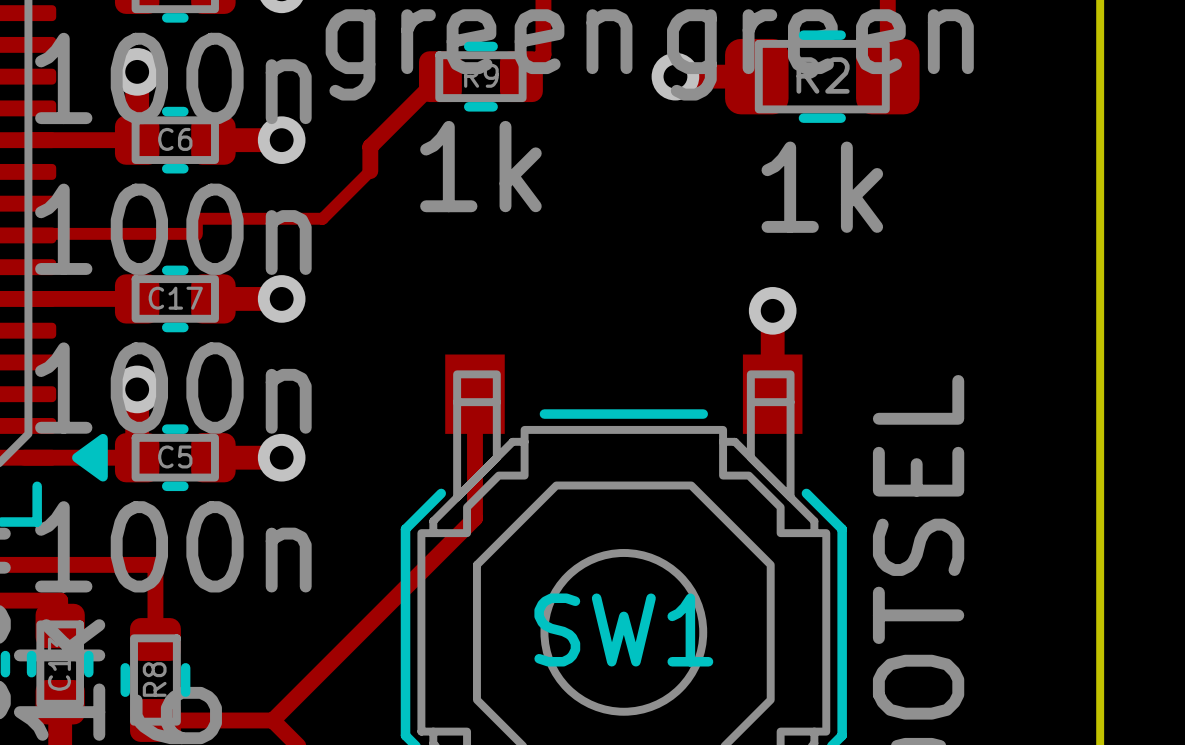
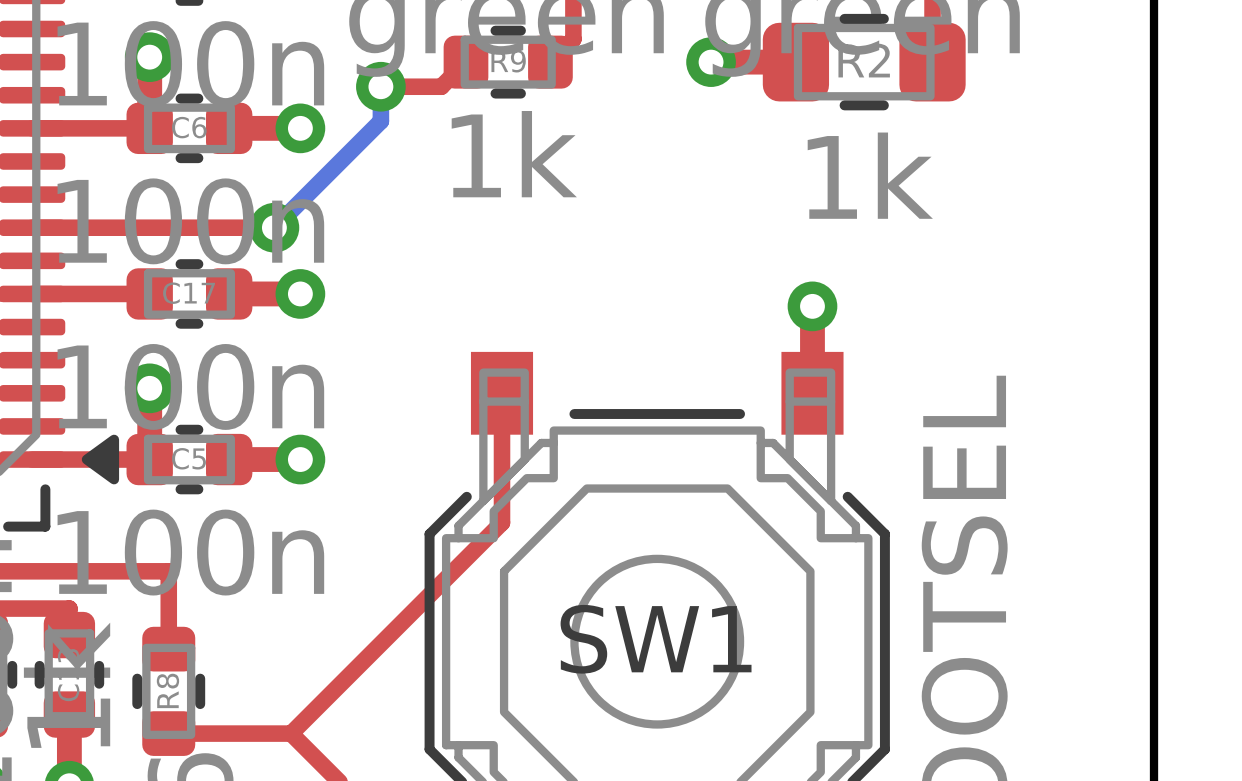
top track: none -> (380, 86) (441, 86)
bottom track: none -> (380, 86) (380, 121) (274, 227)
via: none -> (380, 86)
top track: (416, 100) (370, 146) (370, 171) (322, 218) (194, 218) (194, 233) (26, 233) (24, 235) -> (274, 227) (32, 227)
via: none -> (274, 227)

